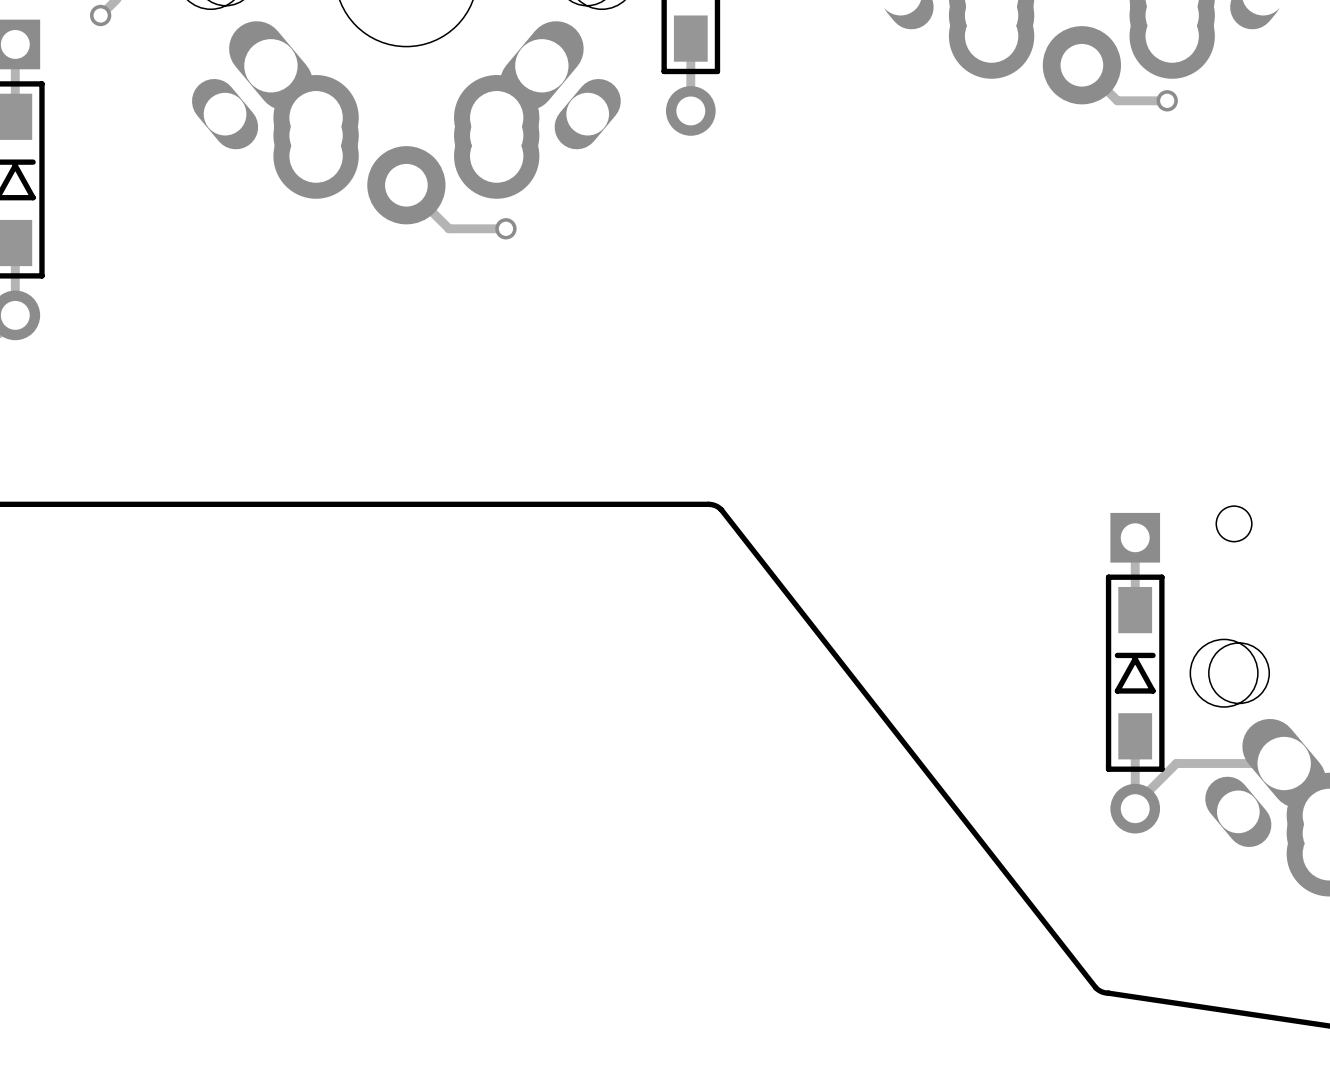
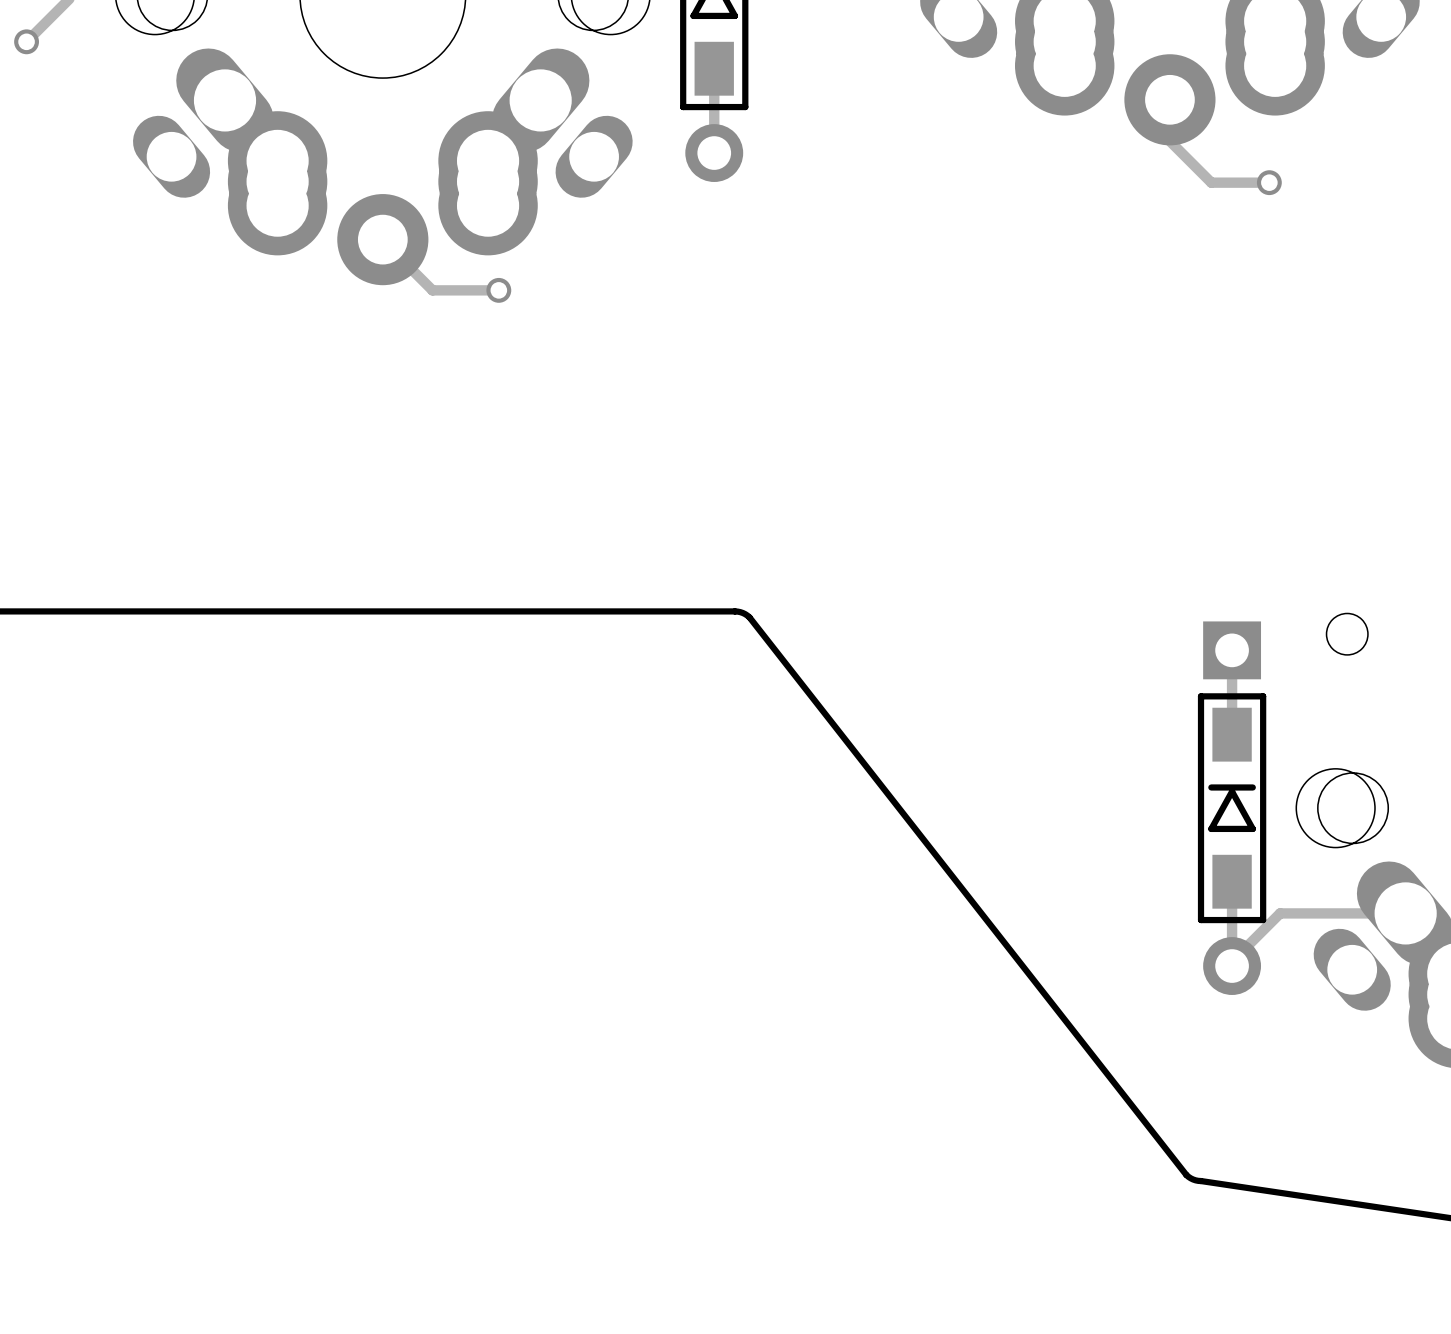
track: (1081, 65) (1117, 100) (1167, 100) -> (1169, 141) (1211, 182) (1269, 182)
via position: (1167, 100) -> (1269, 182)

